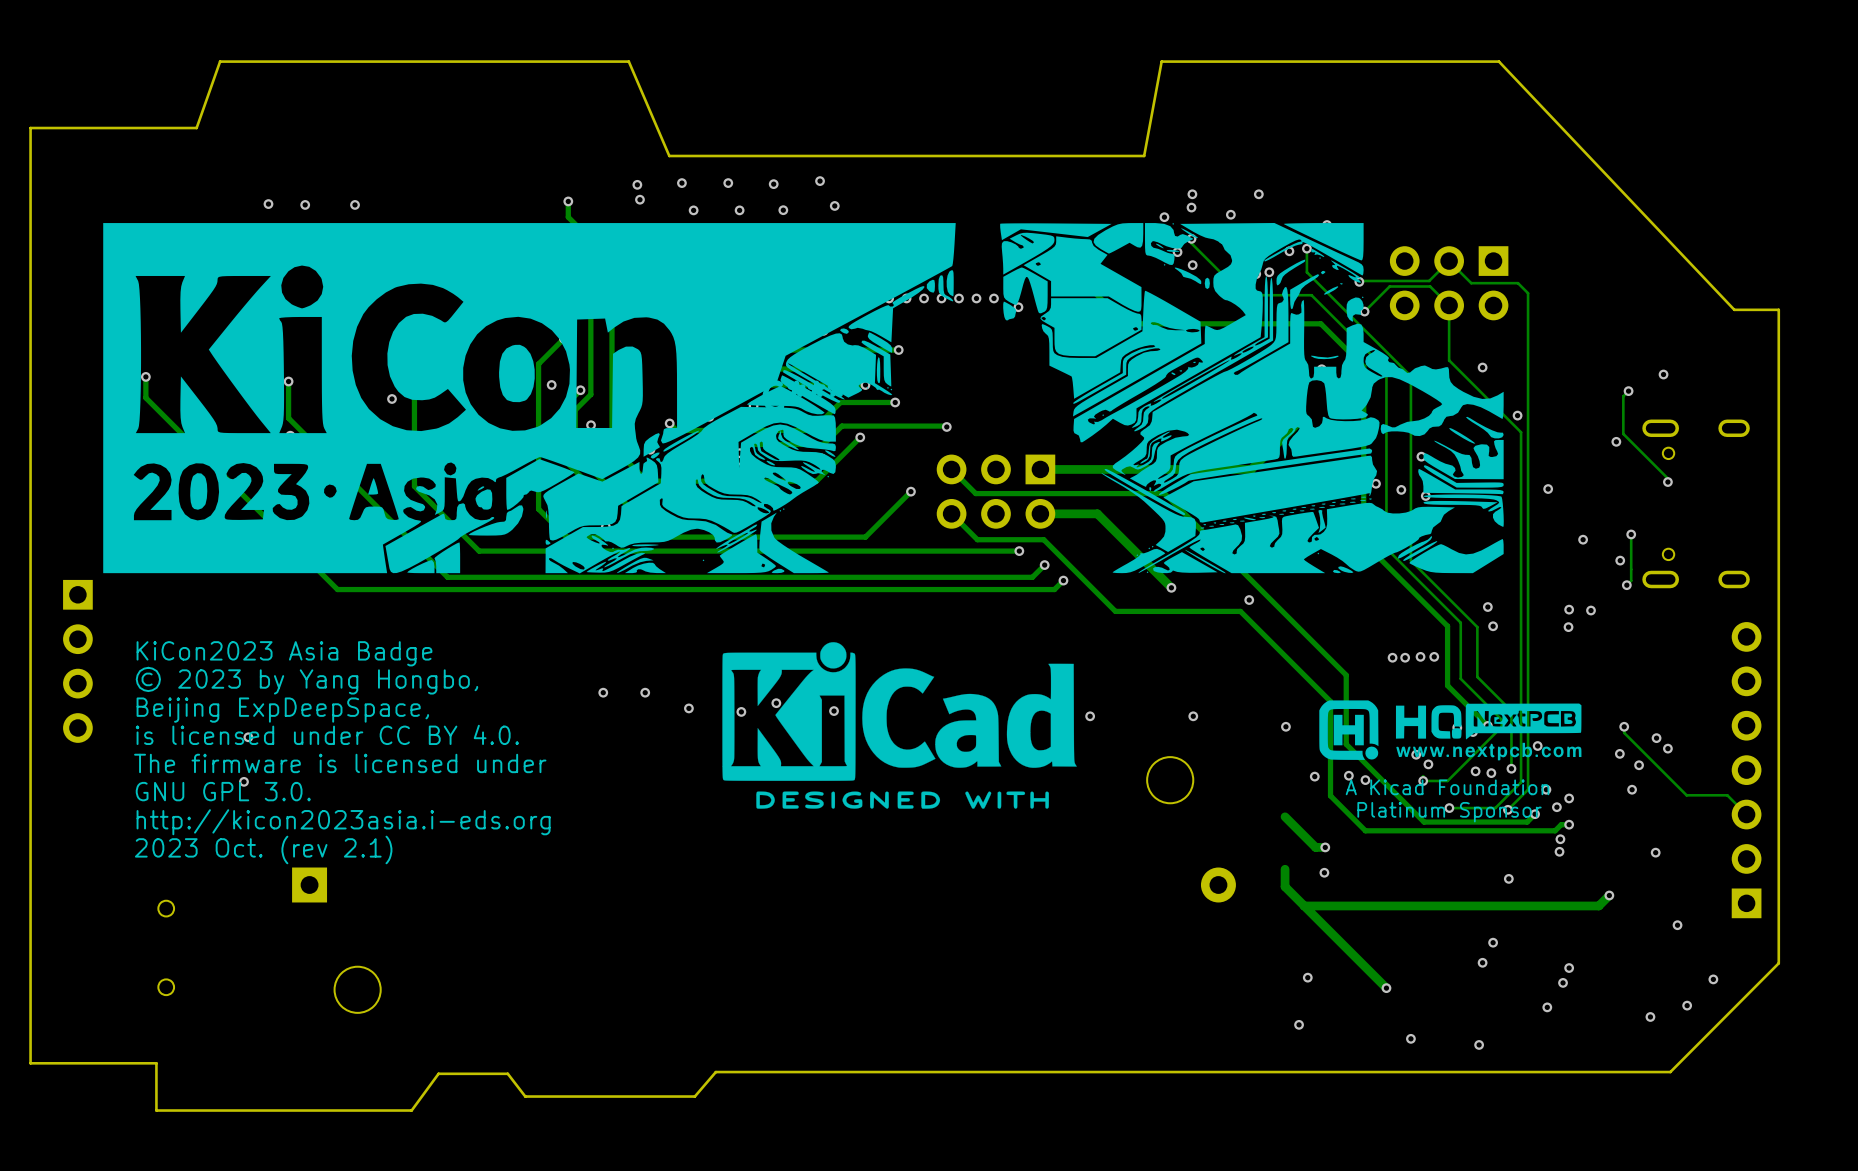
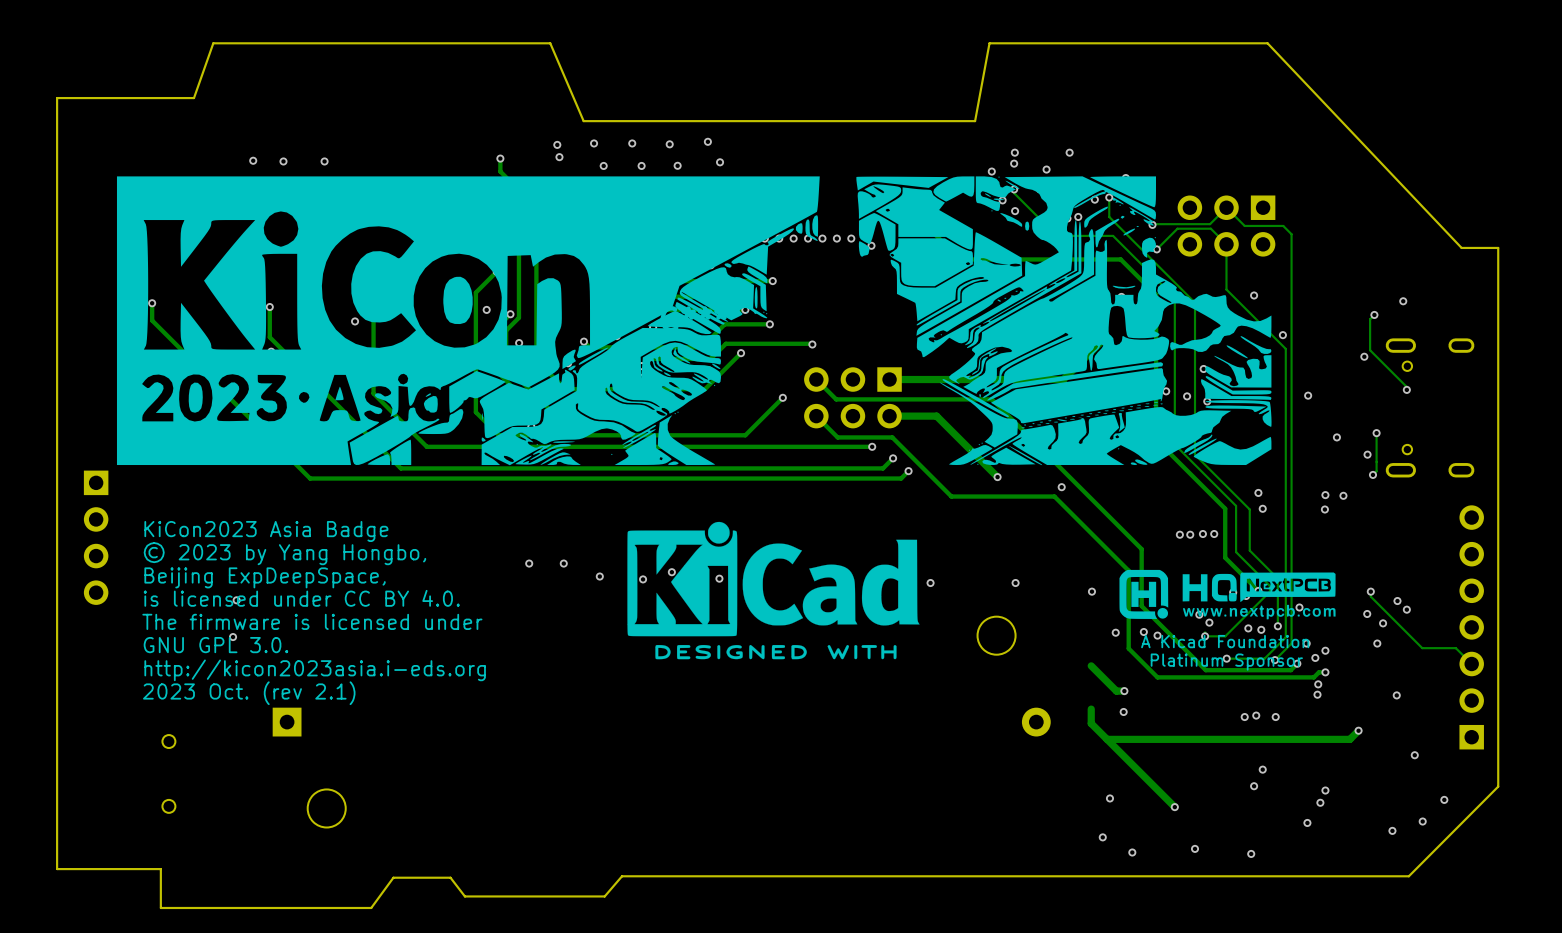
via: none -> (1256, 715)
via: none -> (1244, 717)
via: none -> (1132, 852)

